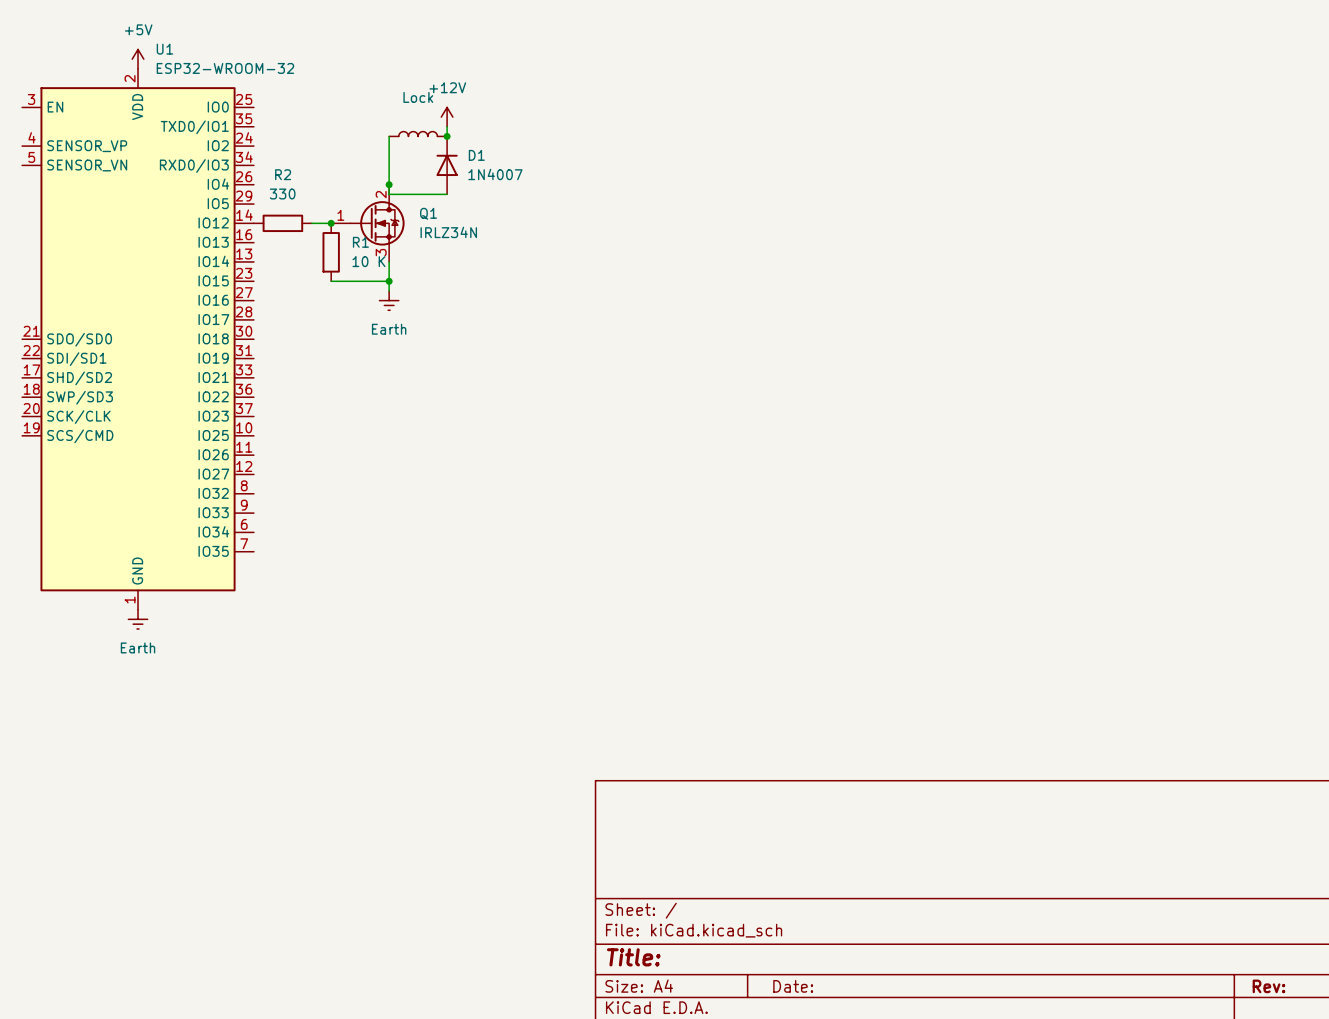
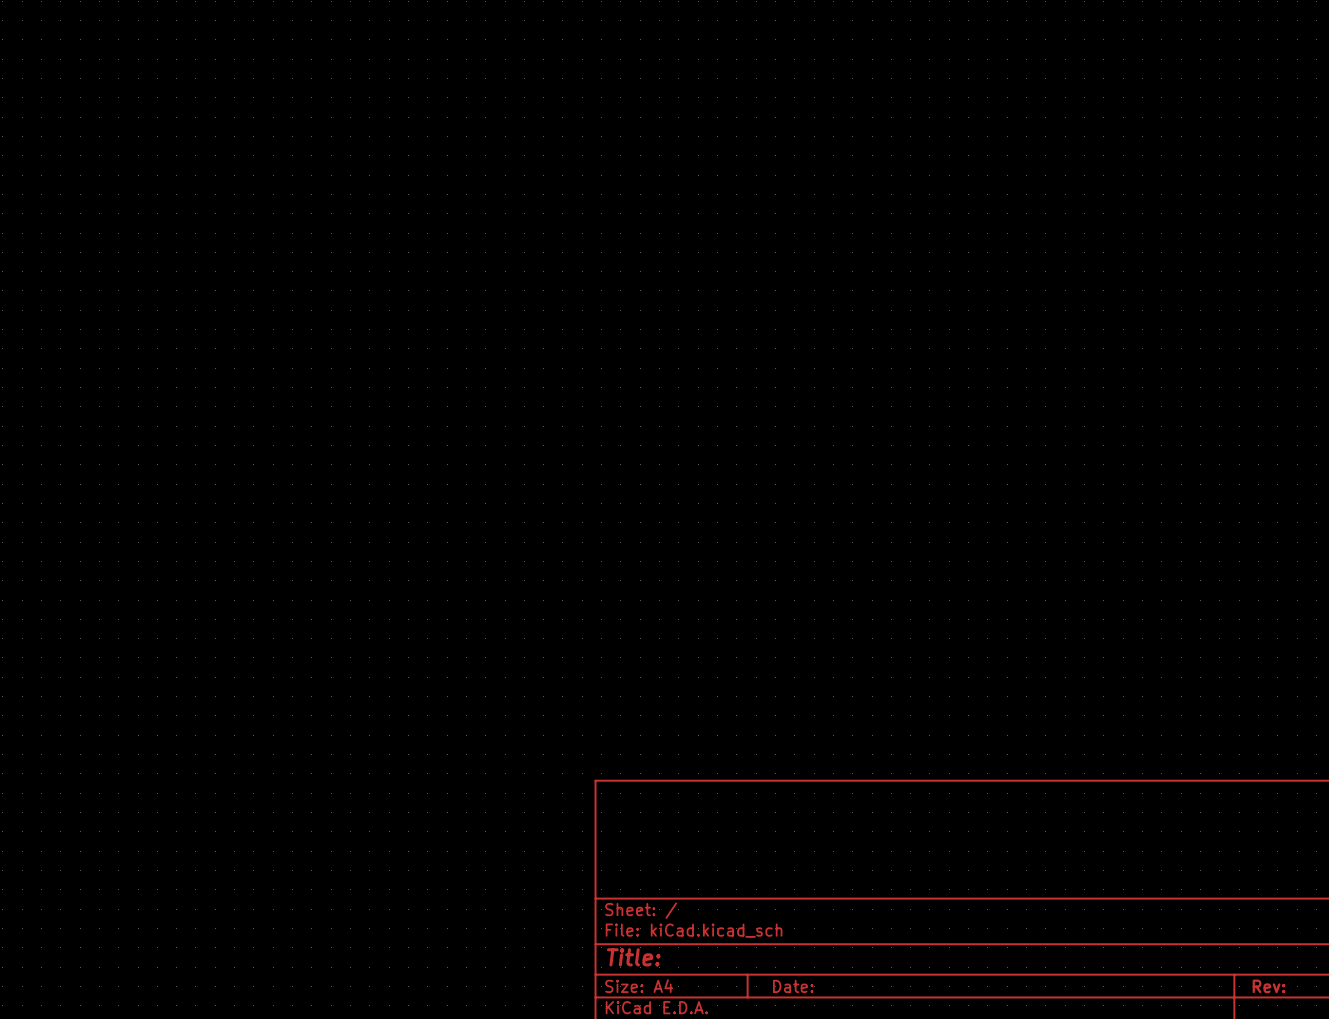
power symbol: +5V (138, 59) -> none
power symbol: +12V (447, 117) -> none
wire: (447, 126) (447, 136) -> none
Lock: (418, 134) -> none
wire: (389, 136) (389, 194) (447, 194) -> none
junction: (447, 136) -> none
D1: 1N4007 (447, 165) -> none
junction: (389, 184) -> none
R2: 330 (282, 223) -> none
wire: (311, 223) (331, 223) -> none
junction: (331, 223) -> none
Q1: IRLZ34N (367, 223) -> none
R1: 10 K (331, 252) -> none
wire: (389, 261) (389, 290) -> none
wire: (331, 281) (389, 281) -> none
junction: (389, 281) -> none
power symbol: Earth (389, 300) -> none
U1: ESP32-WROOM-32 (138, 339) -> none
power symbol: Earth (138, 619) -> none

